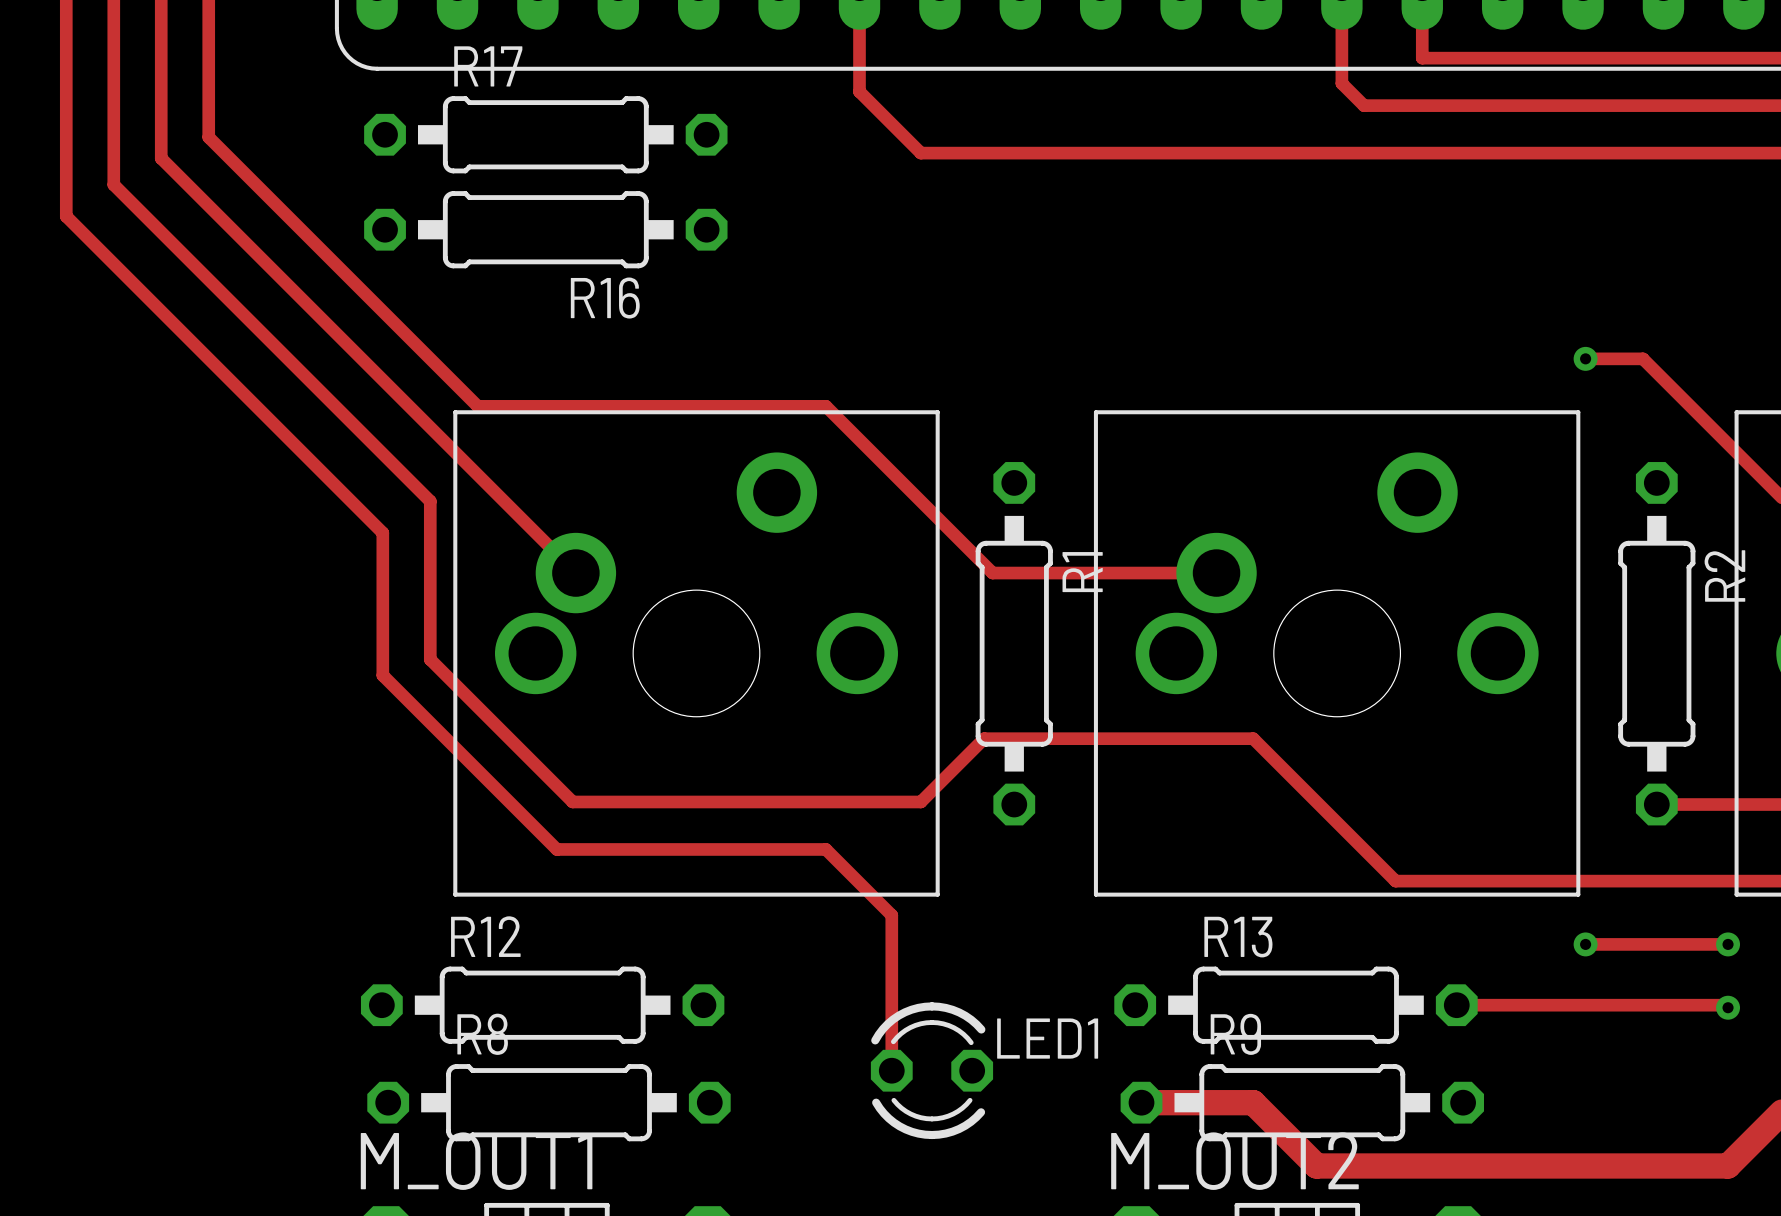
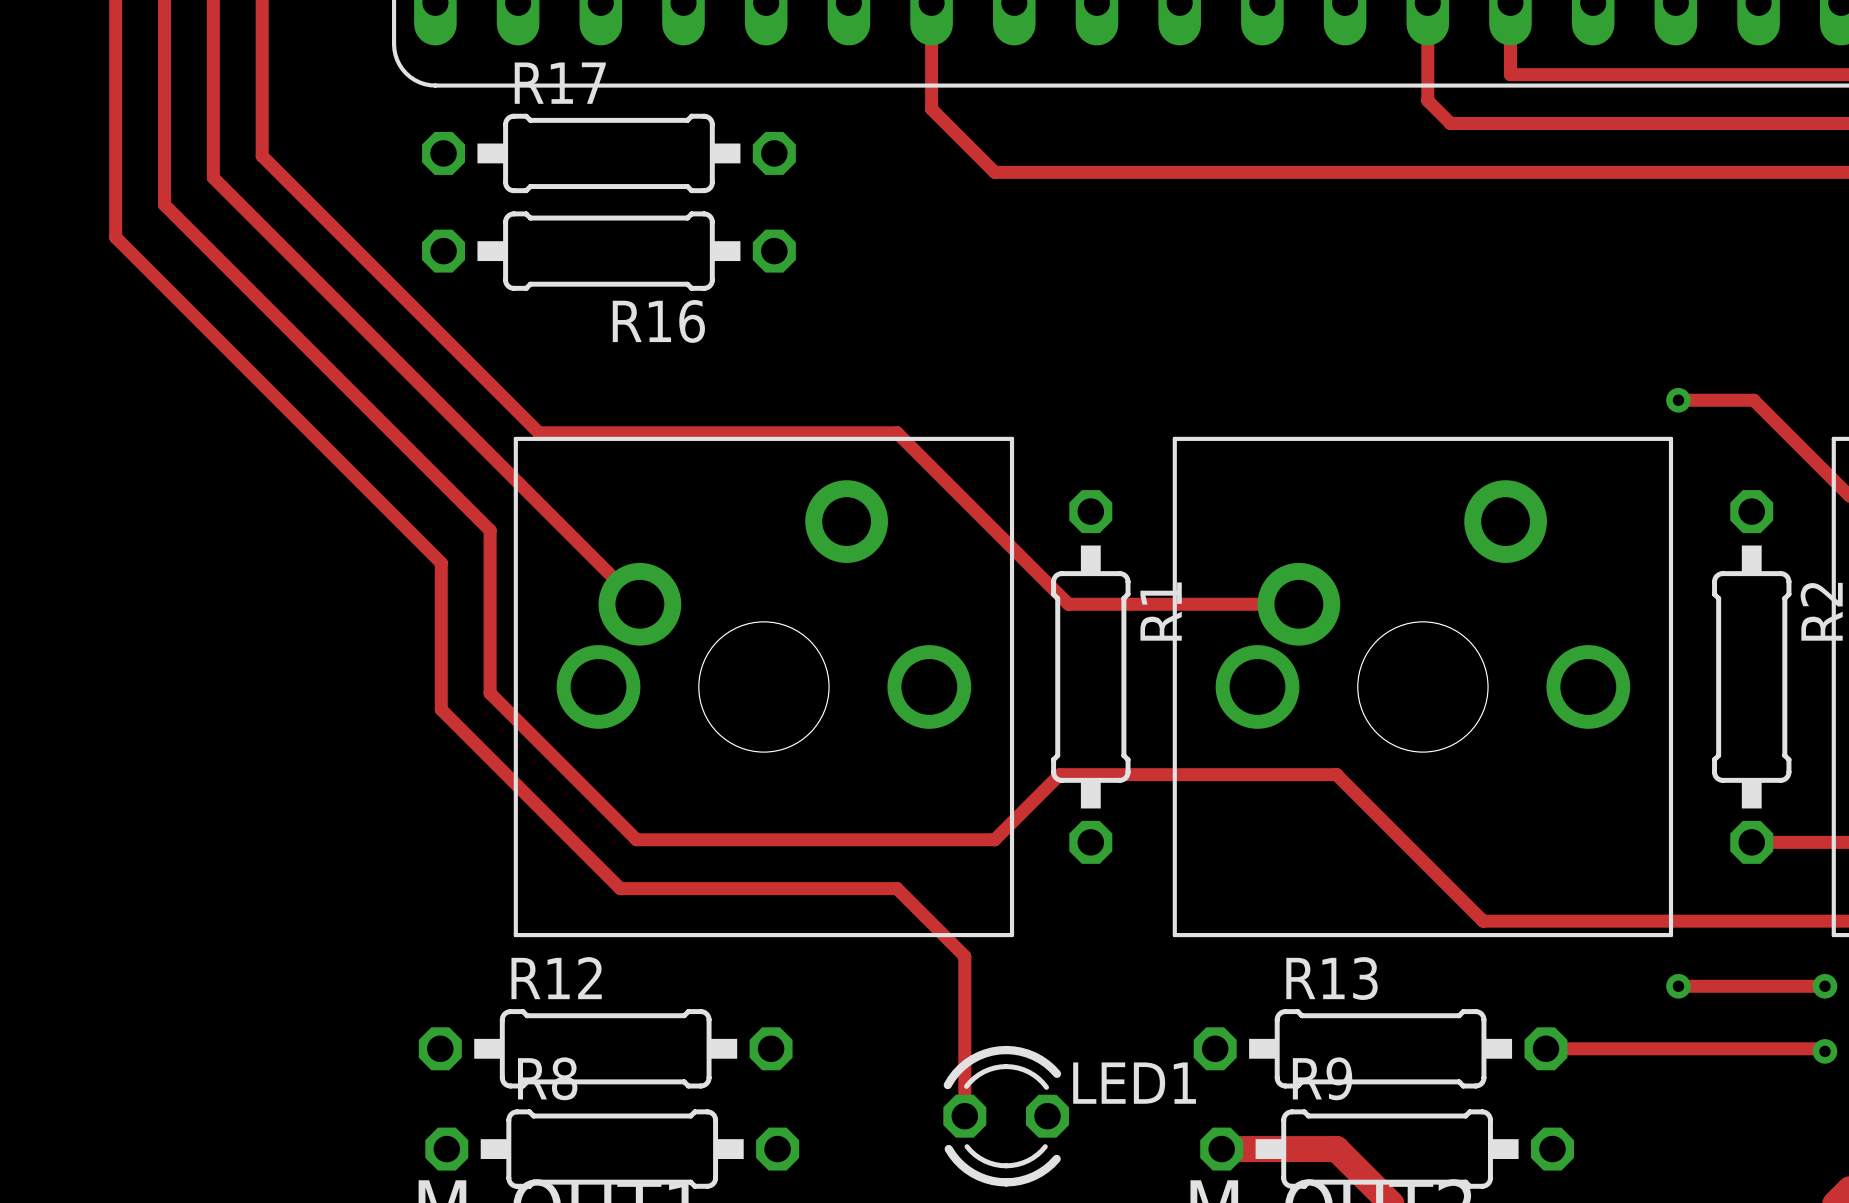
track: (1585, 358) (1642, 358) (1658, 374) -> (1678, 400) (1753, 400)
via position: (1585, 358) -> (1678, 400)

